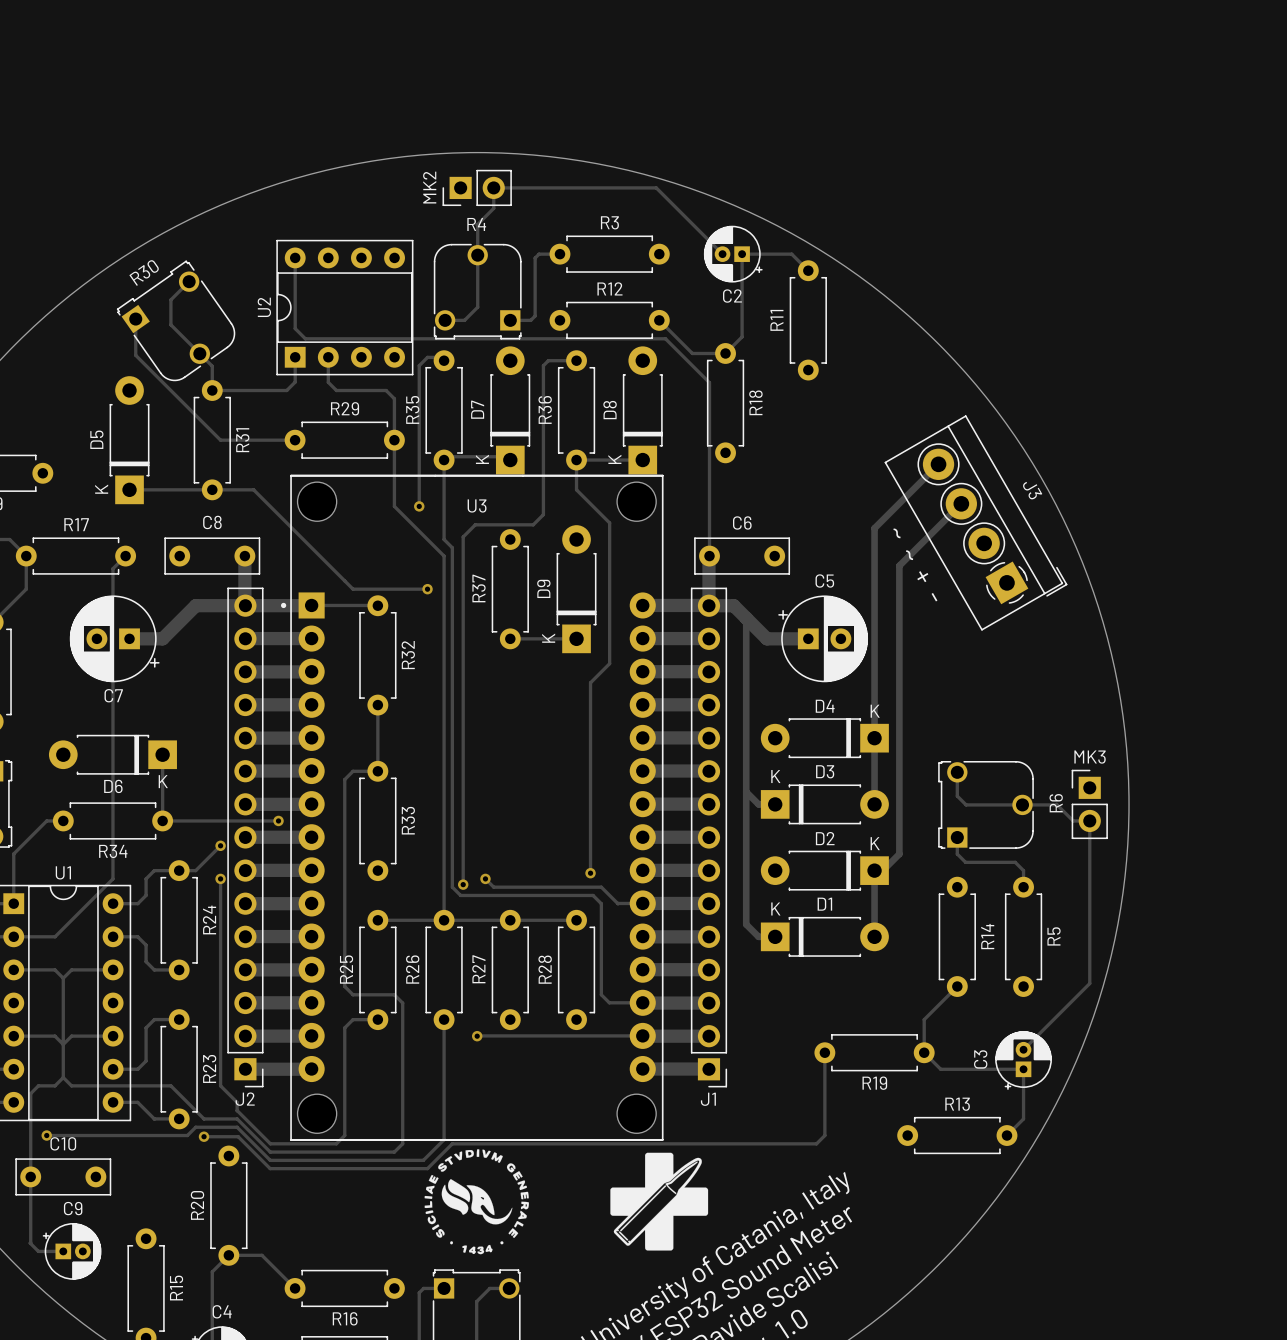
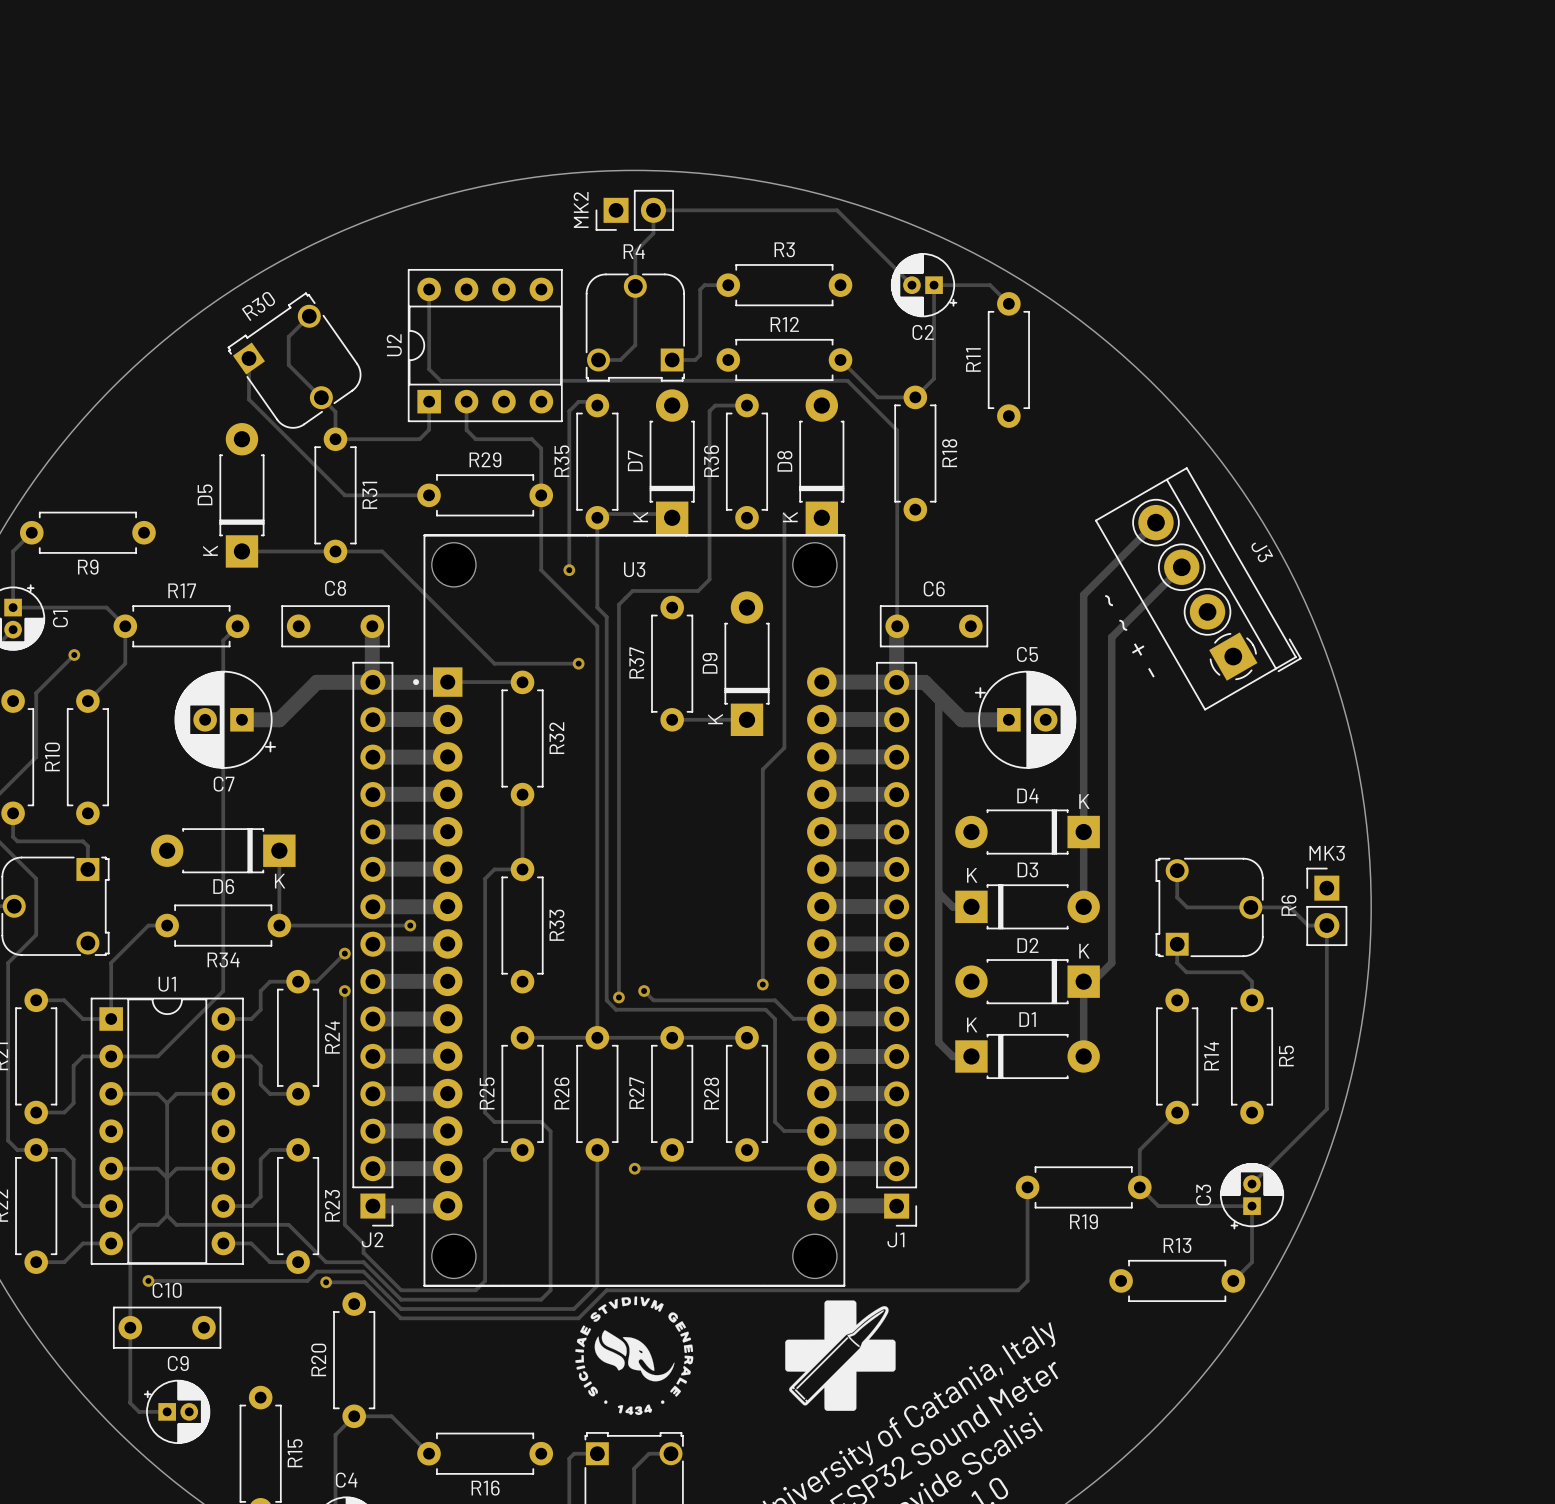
track: (642, 460) (576, 460) (576, 489) (609, 522) -> (784, 514) (784, 588)

